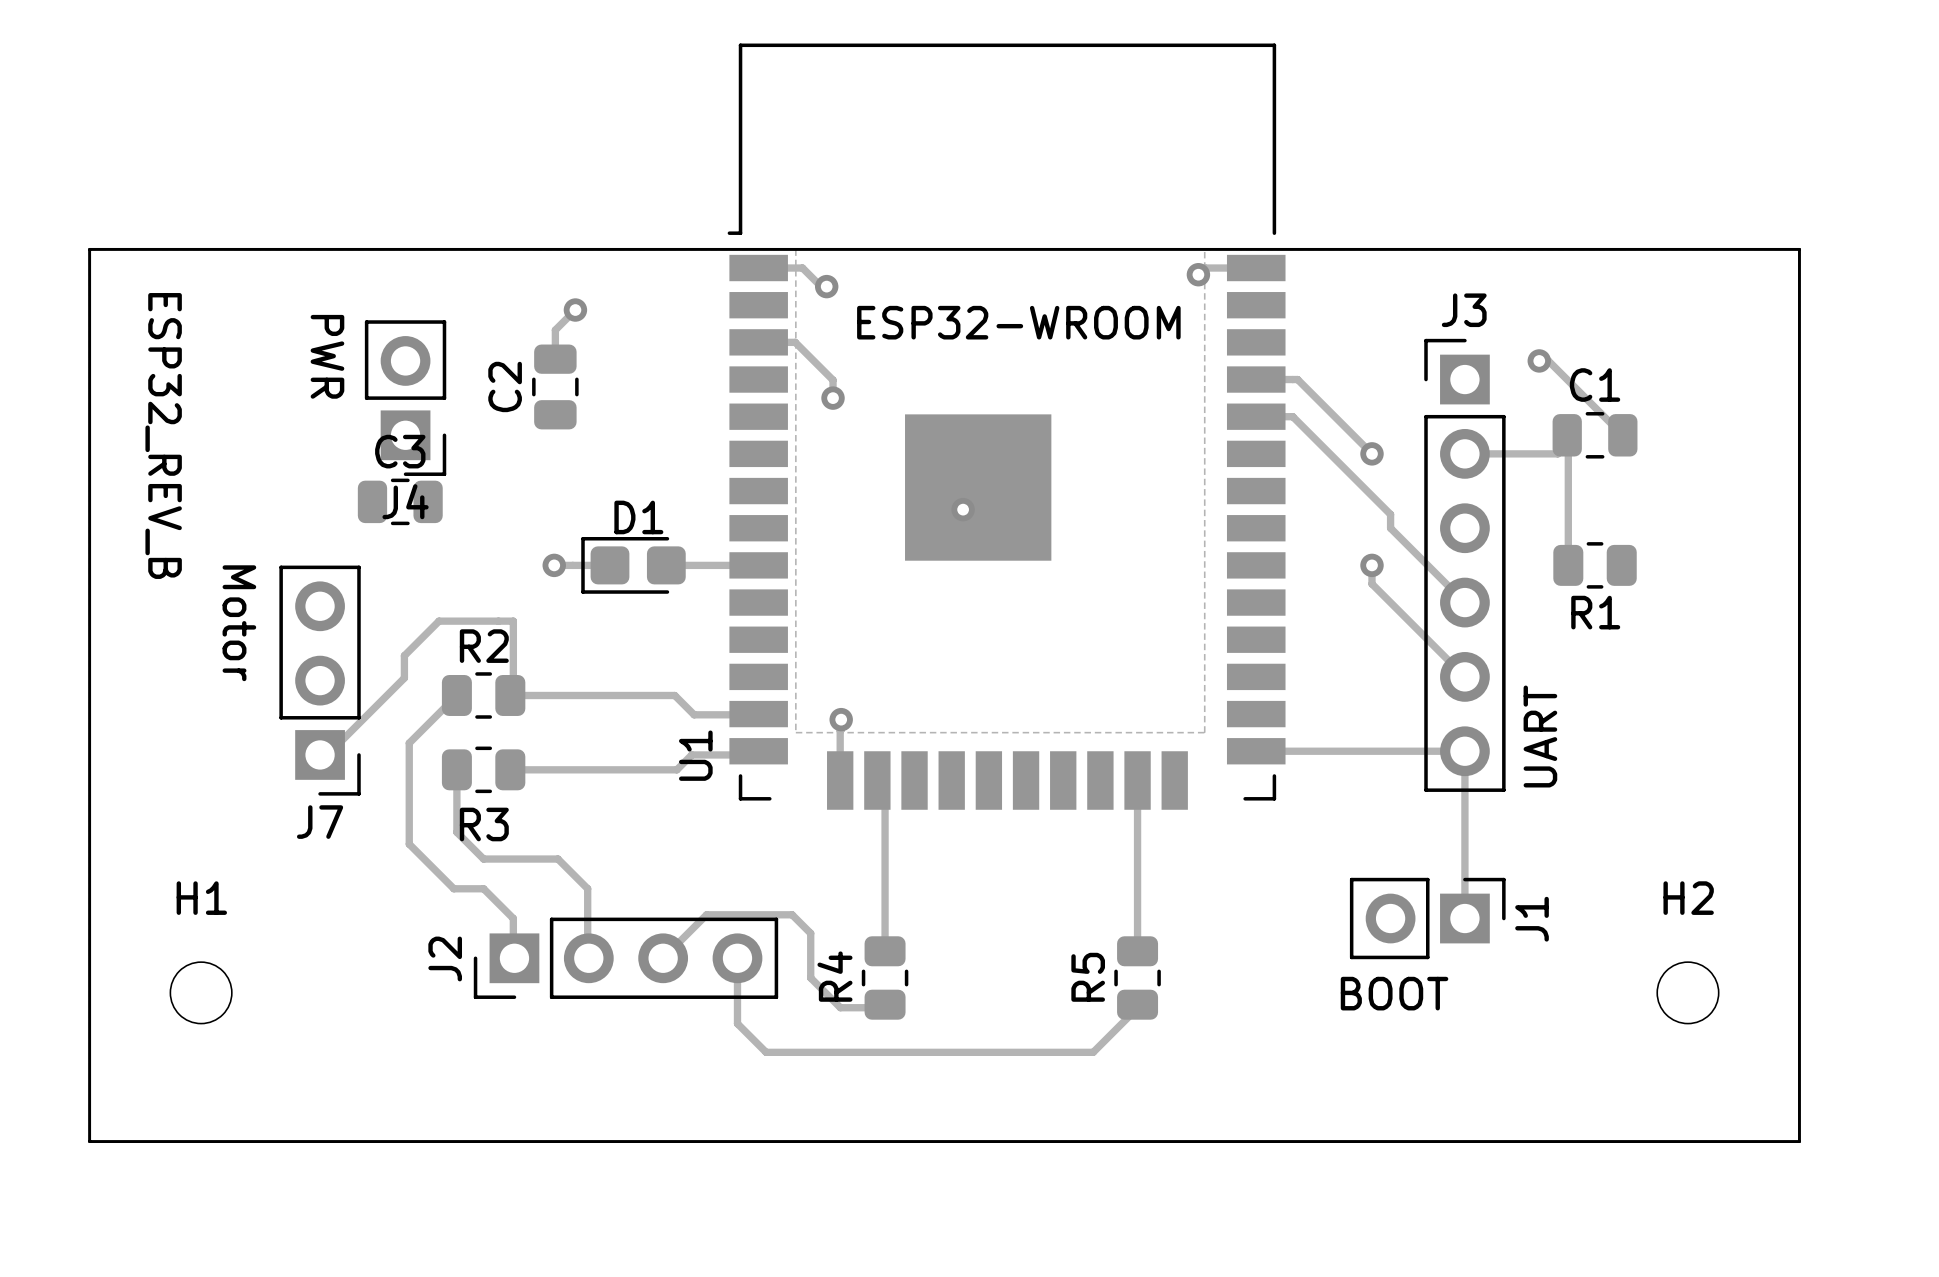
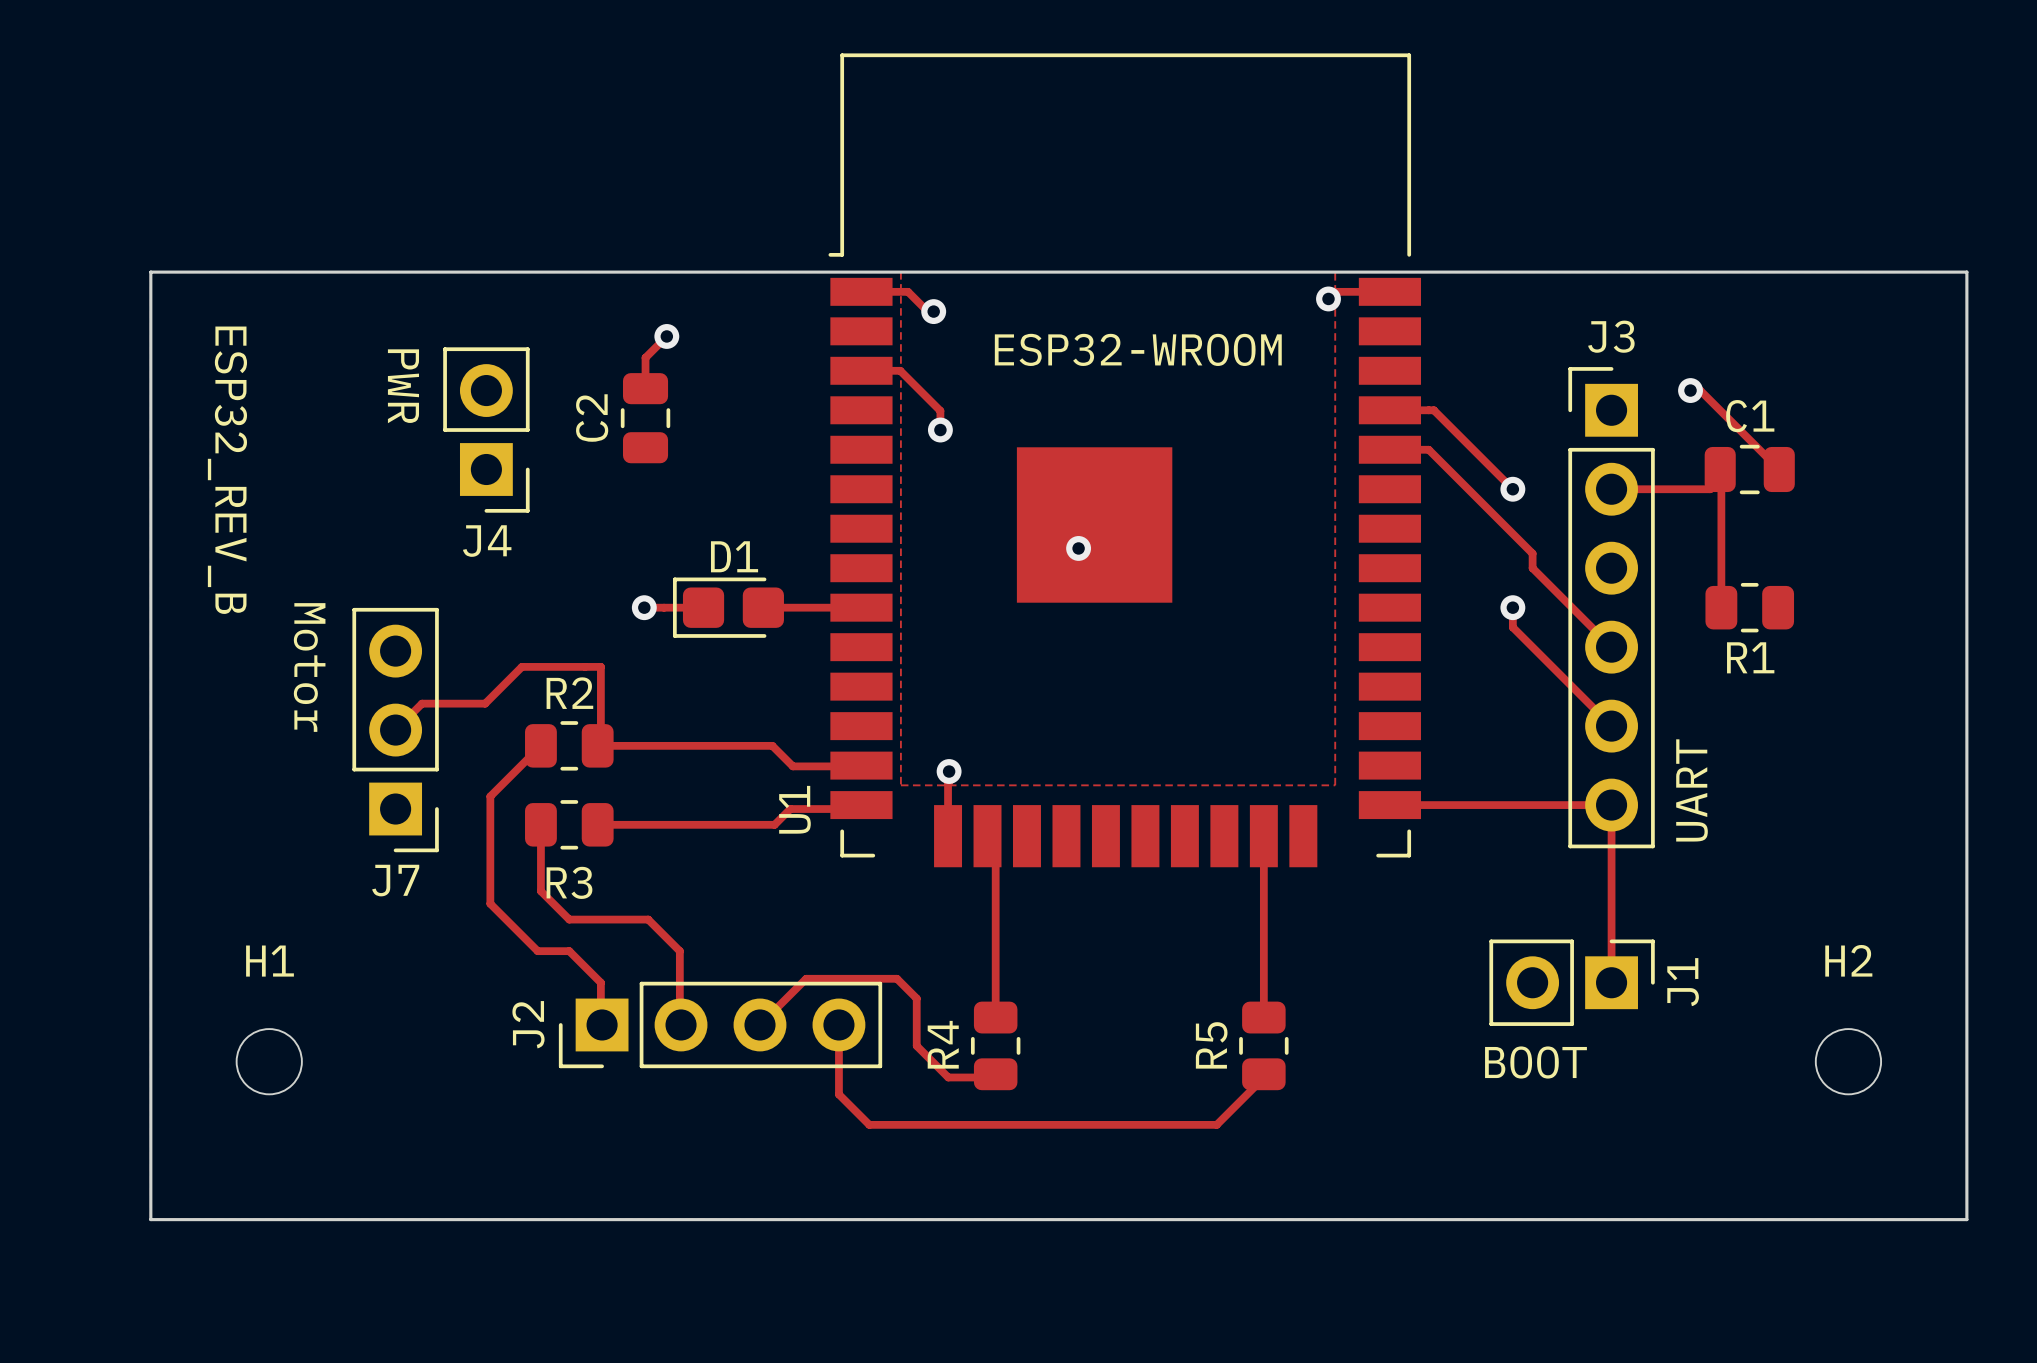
C3: (400, 501) -> none
track: (404, 655) (404, 678) (331, 751) -> (485, 703) (422, 703) (395, 730)

